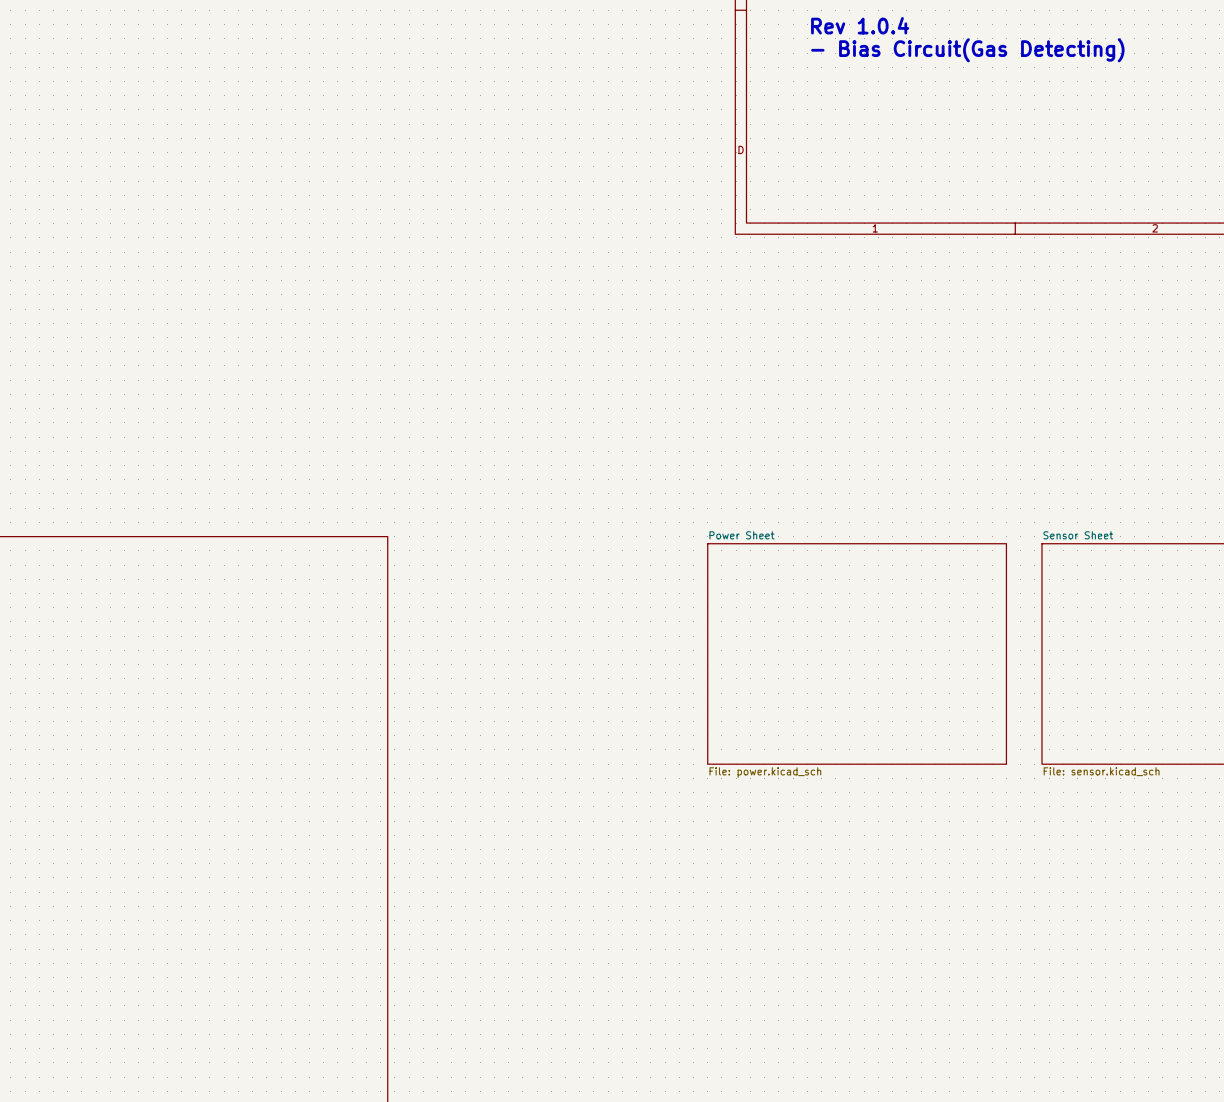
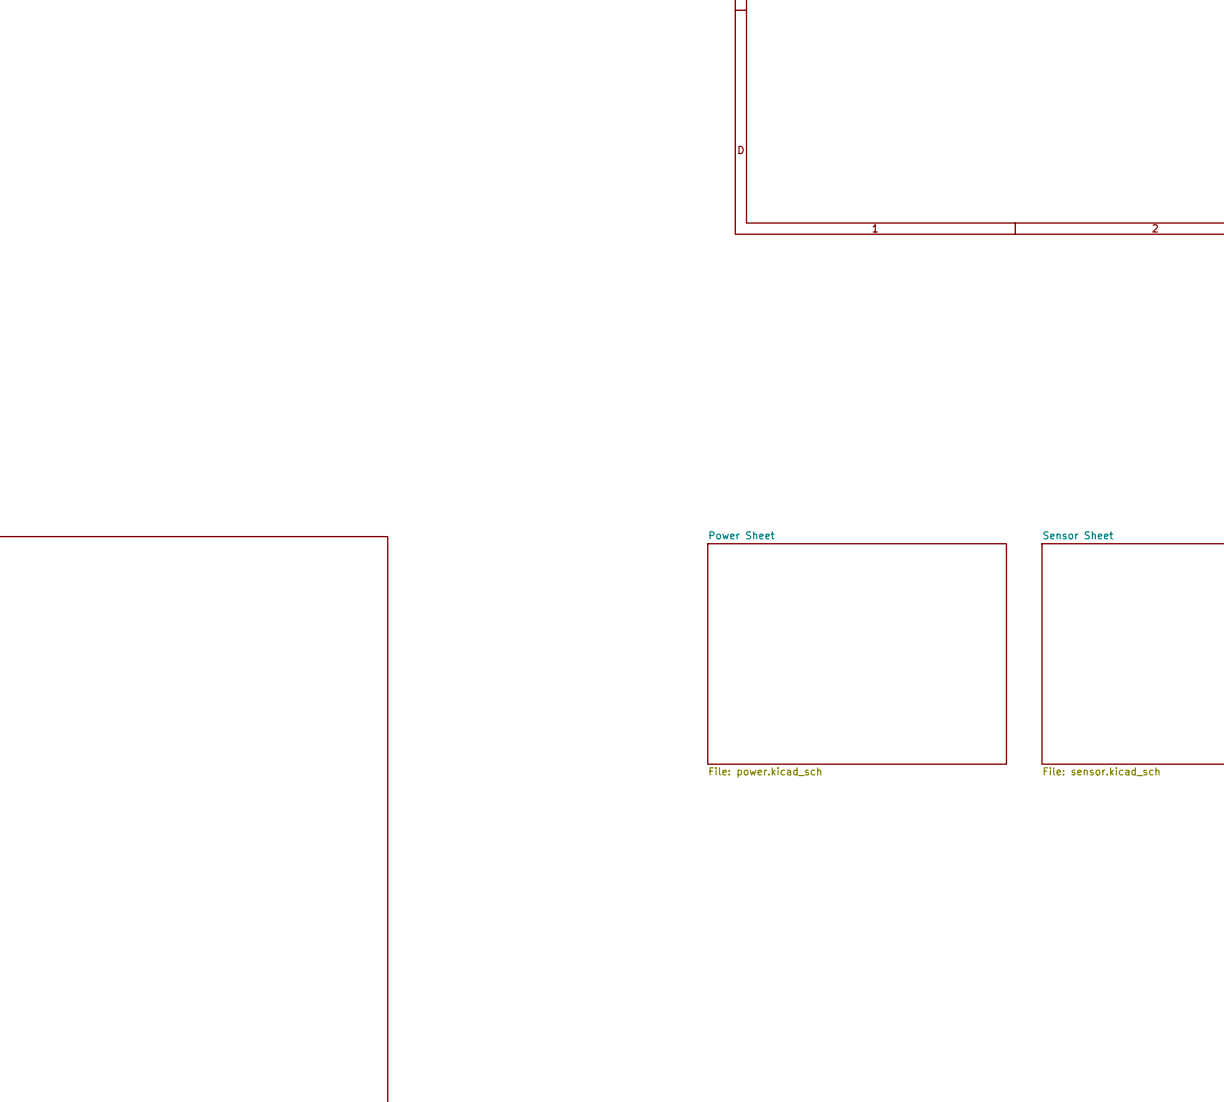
text: Rev 1.0.4 (860, 25) -> none
text: - Bias Circuit(Gas Detecting) (967, 50) -> none

